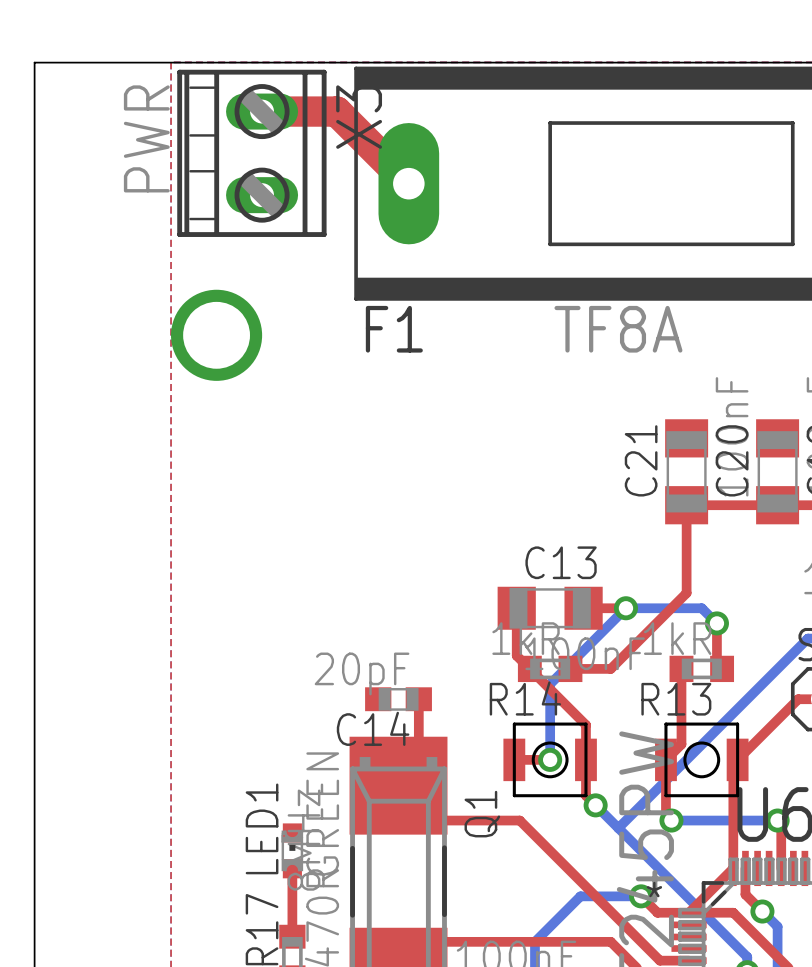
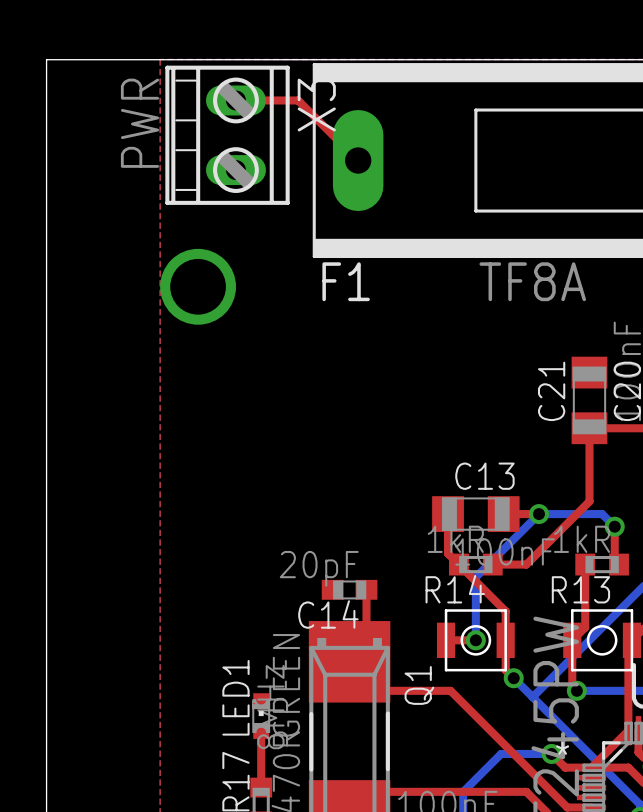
top track width: thick (262, 111) (336, 111) (408, 183) -> thin (235, 100) (298, 100) (358, 160)

